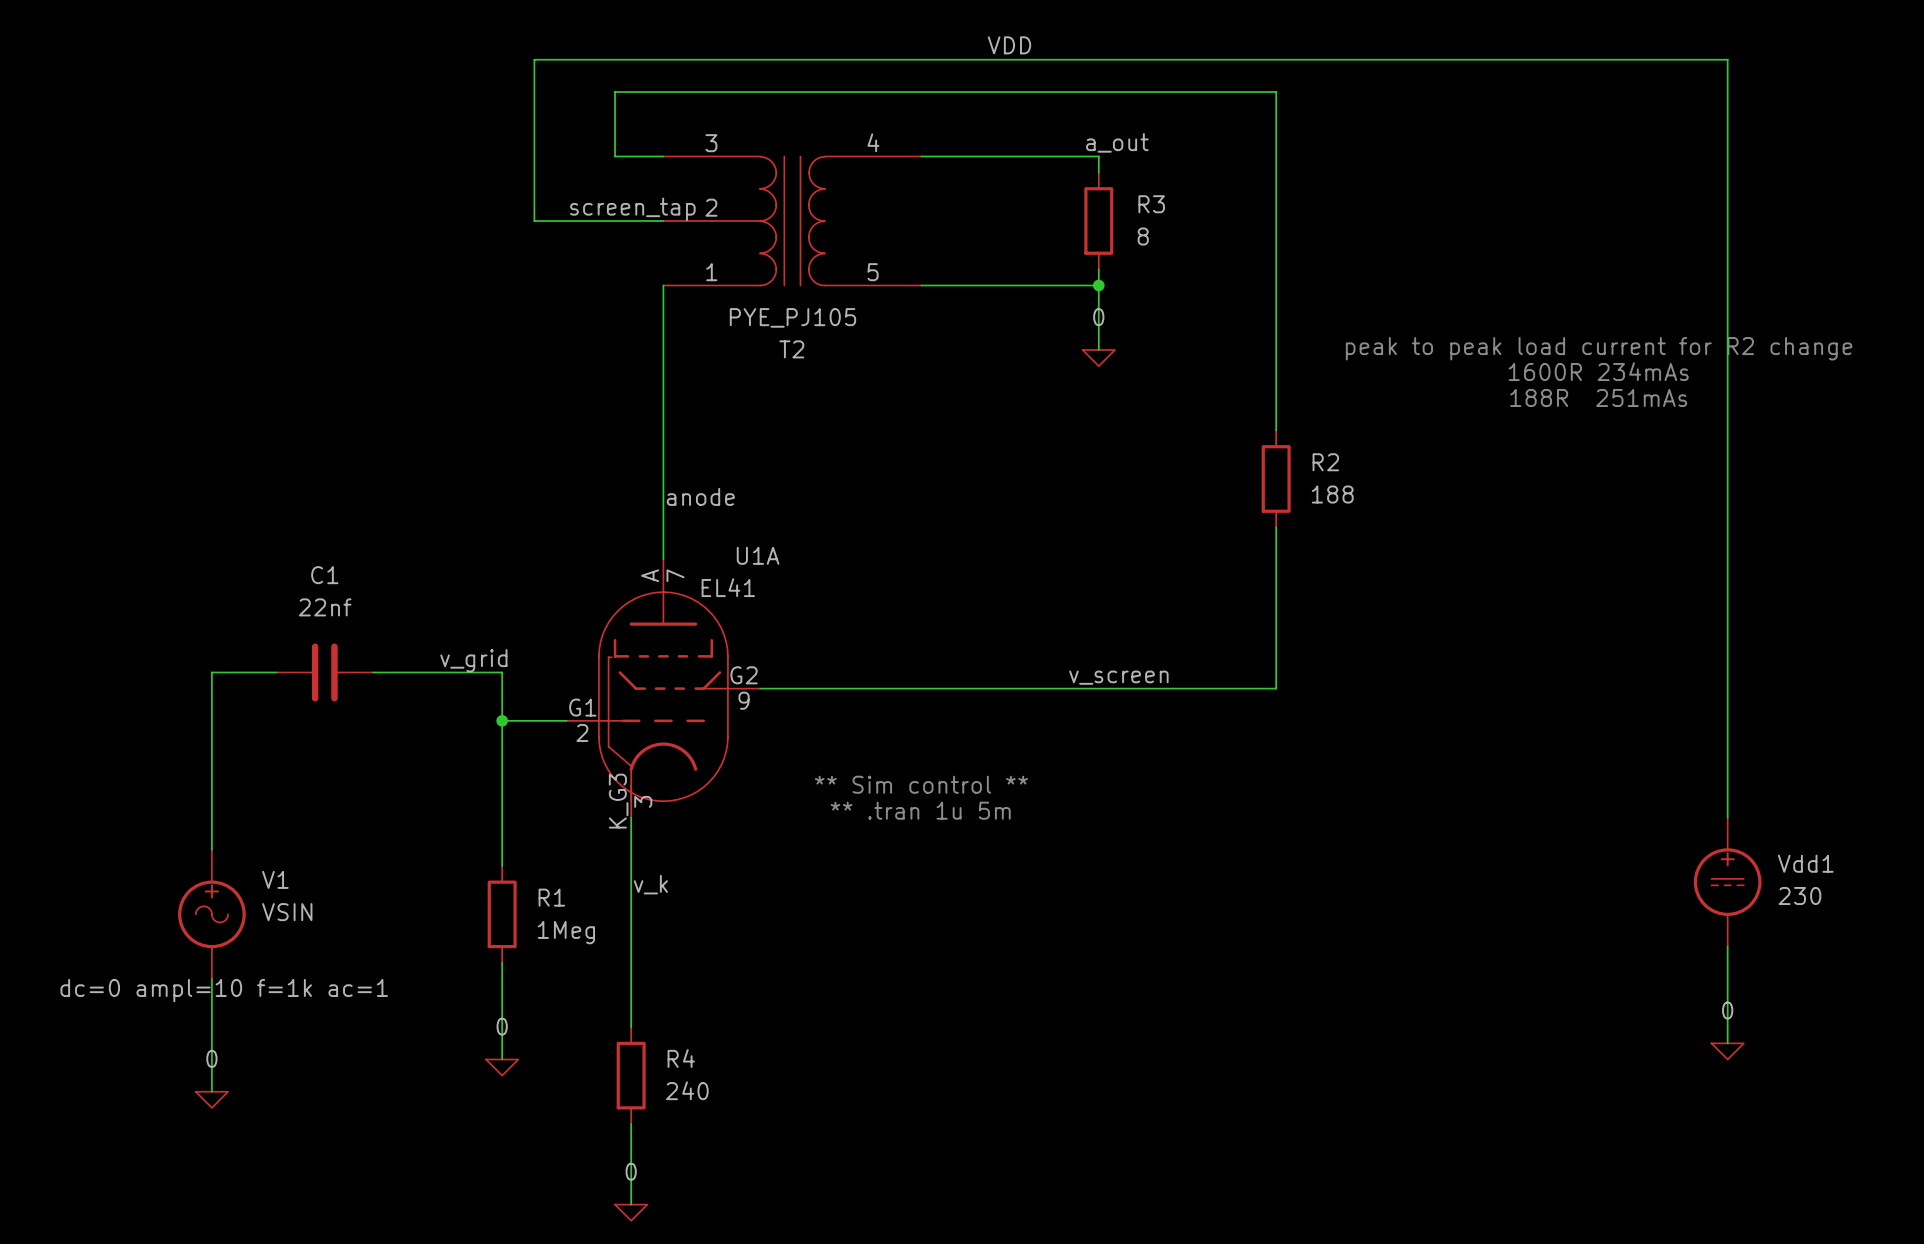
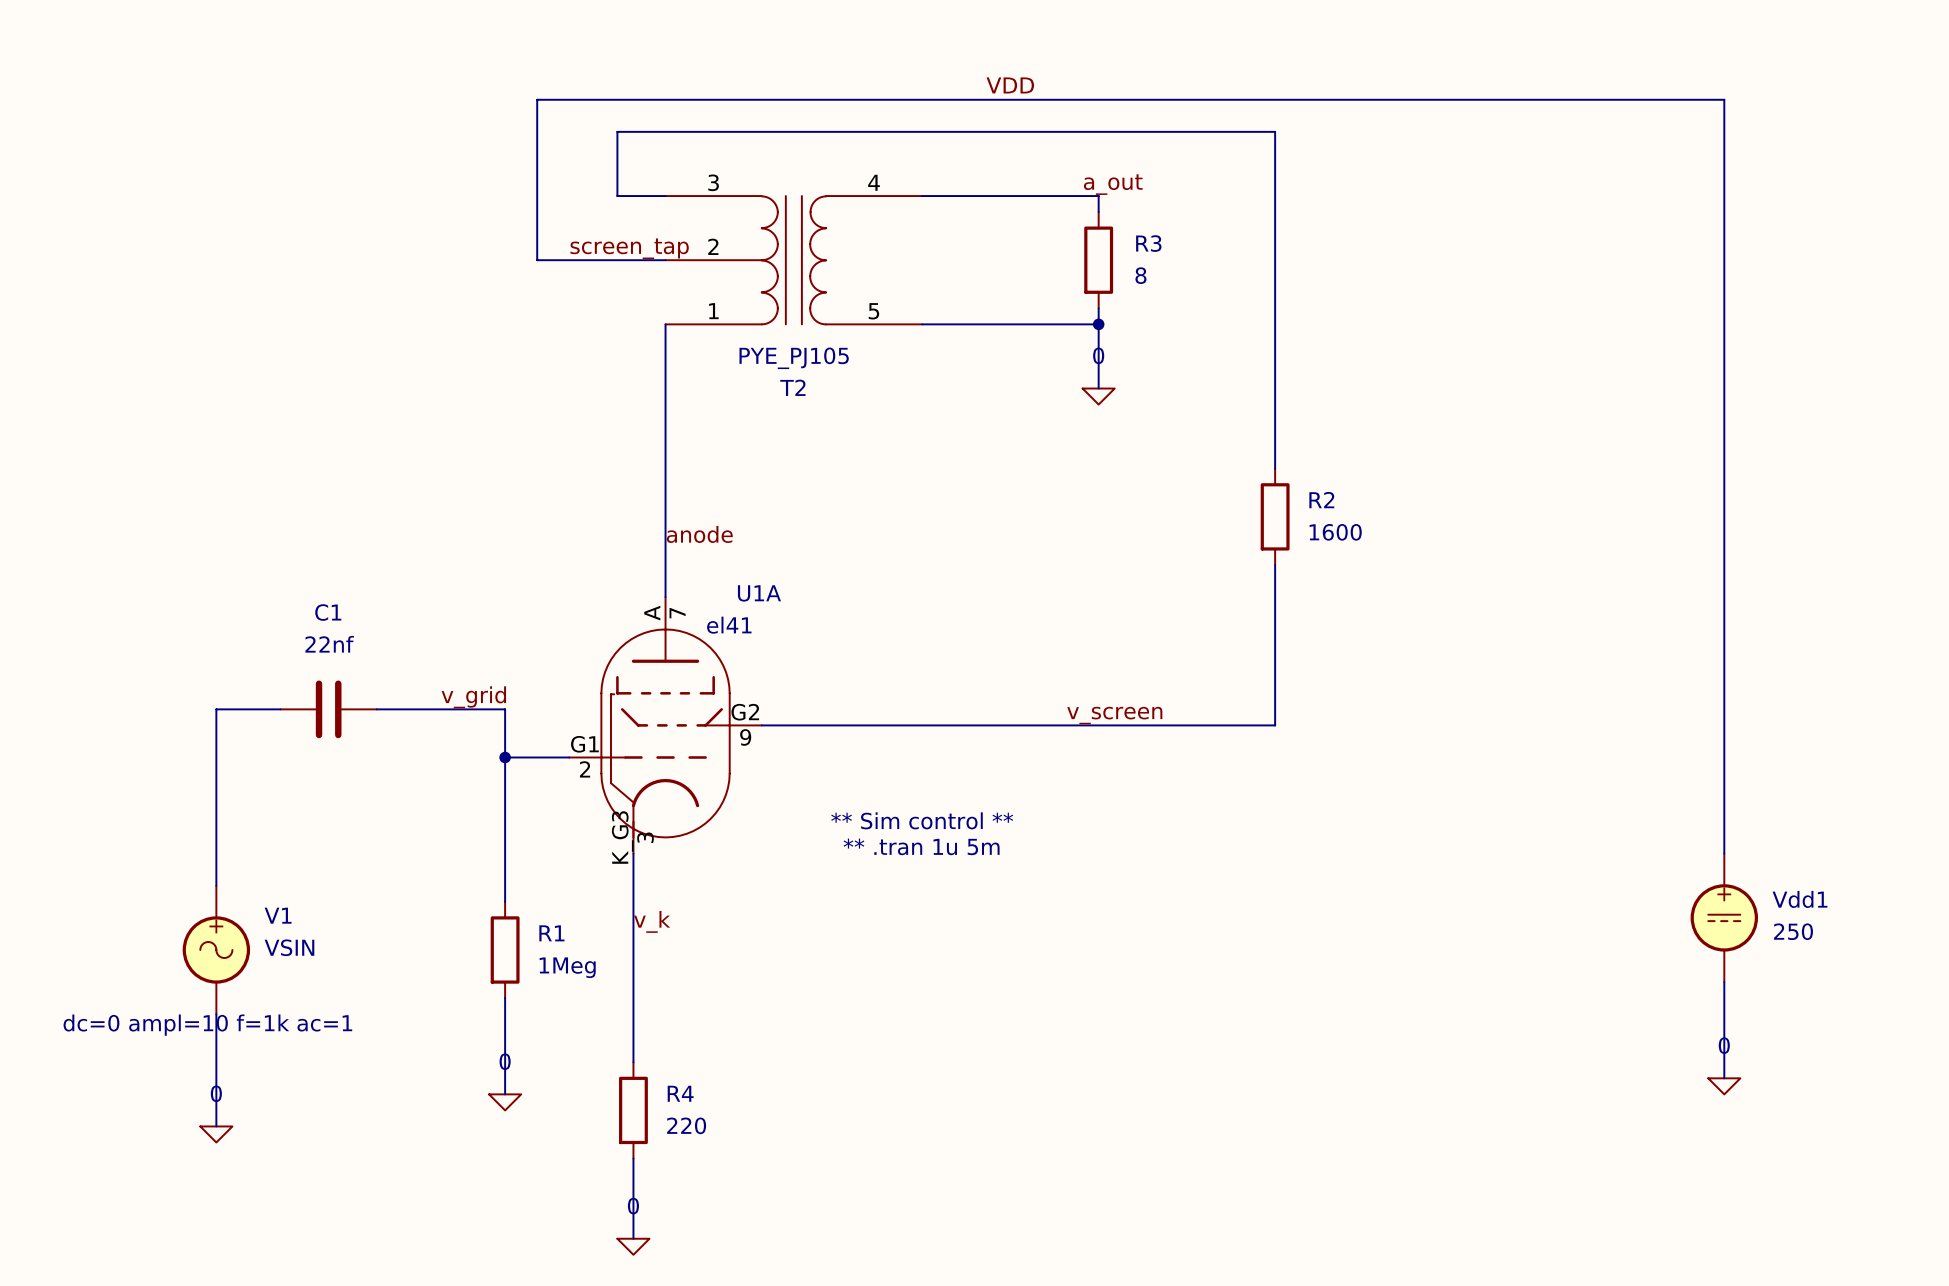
text: peak to peak load current for R2 change (1599, 348) -> none
text: 1600R 234mAs (1598, 371) -> none
text: 188R 251mAs (1598, 397) -> none
R2 value: 188 (1332, 494) -> 1600 (1335, 532)
U1A value: EL41 (728, 587) -> el41 (729, 625)
Vdd1 value: 230 (1799, 895) -> 250 (1793, 931)
R4 value: 240 (687, 1090) -> 220 (686, 1125)

